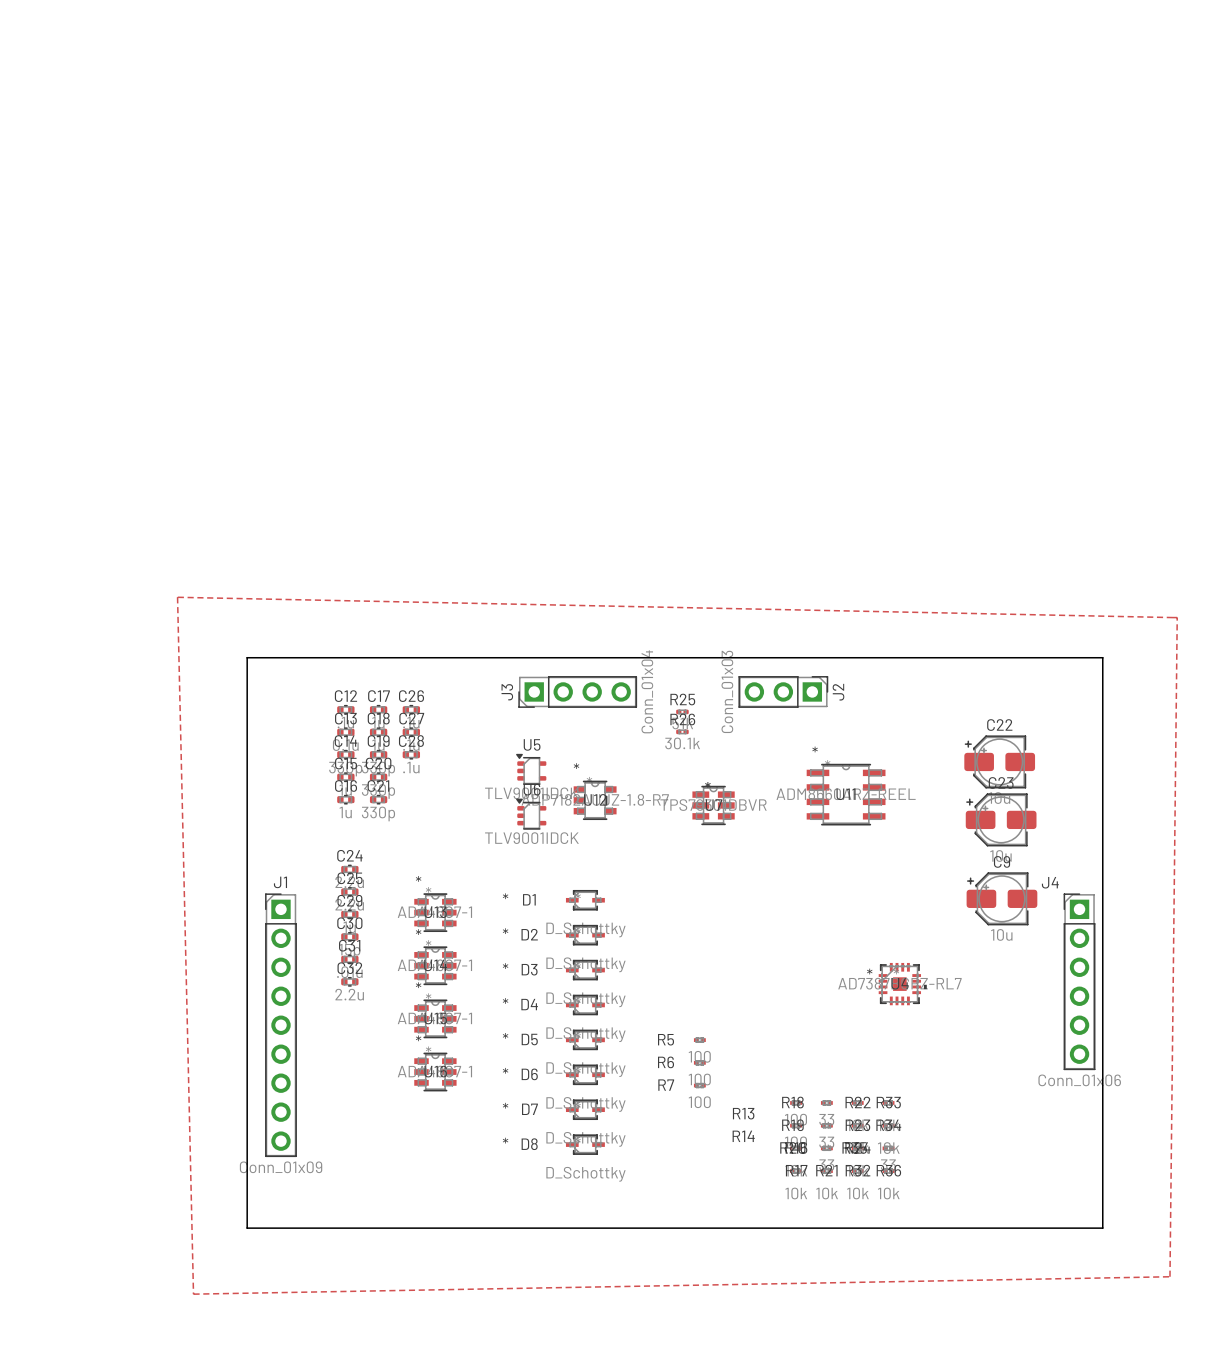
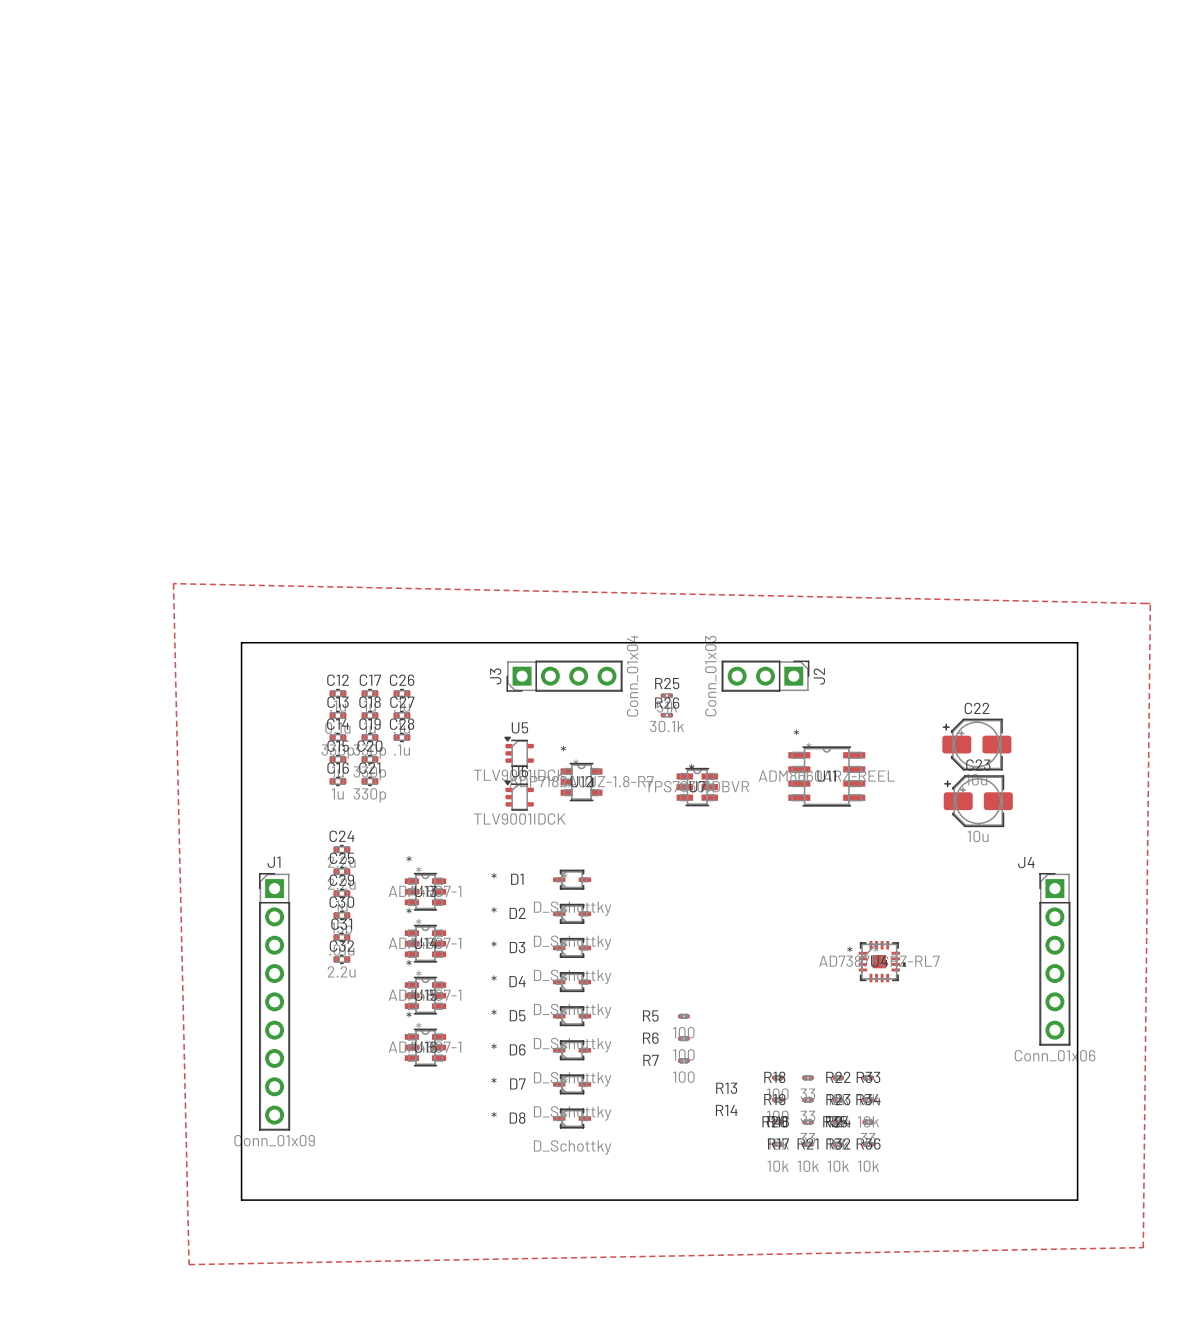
C9: 10u (1001, 898) -> none

